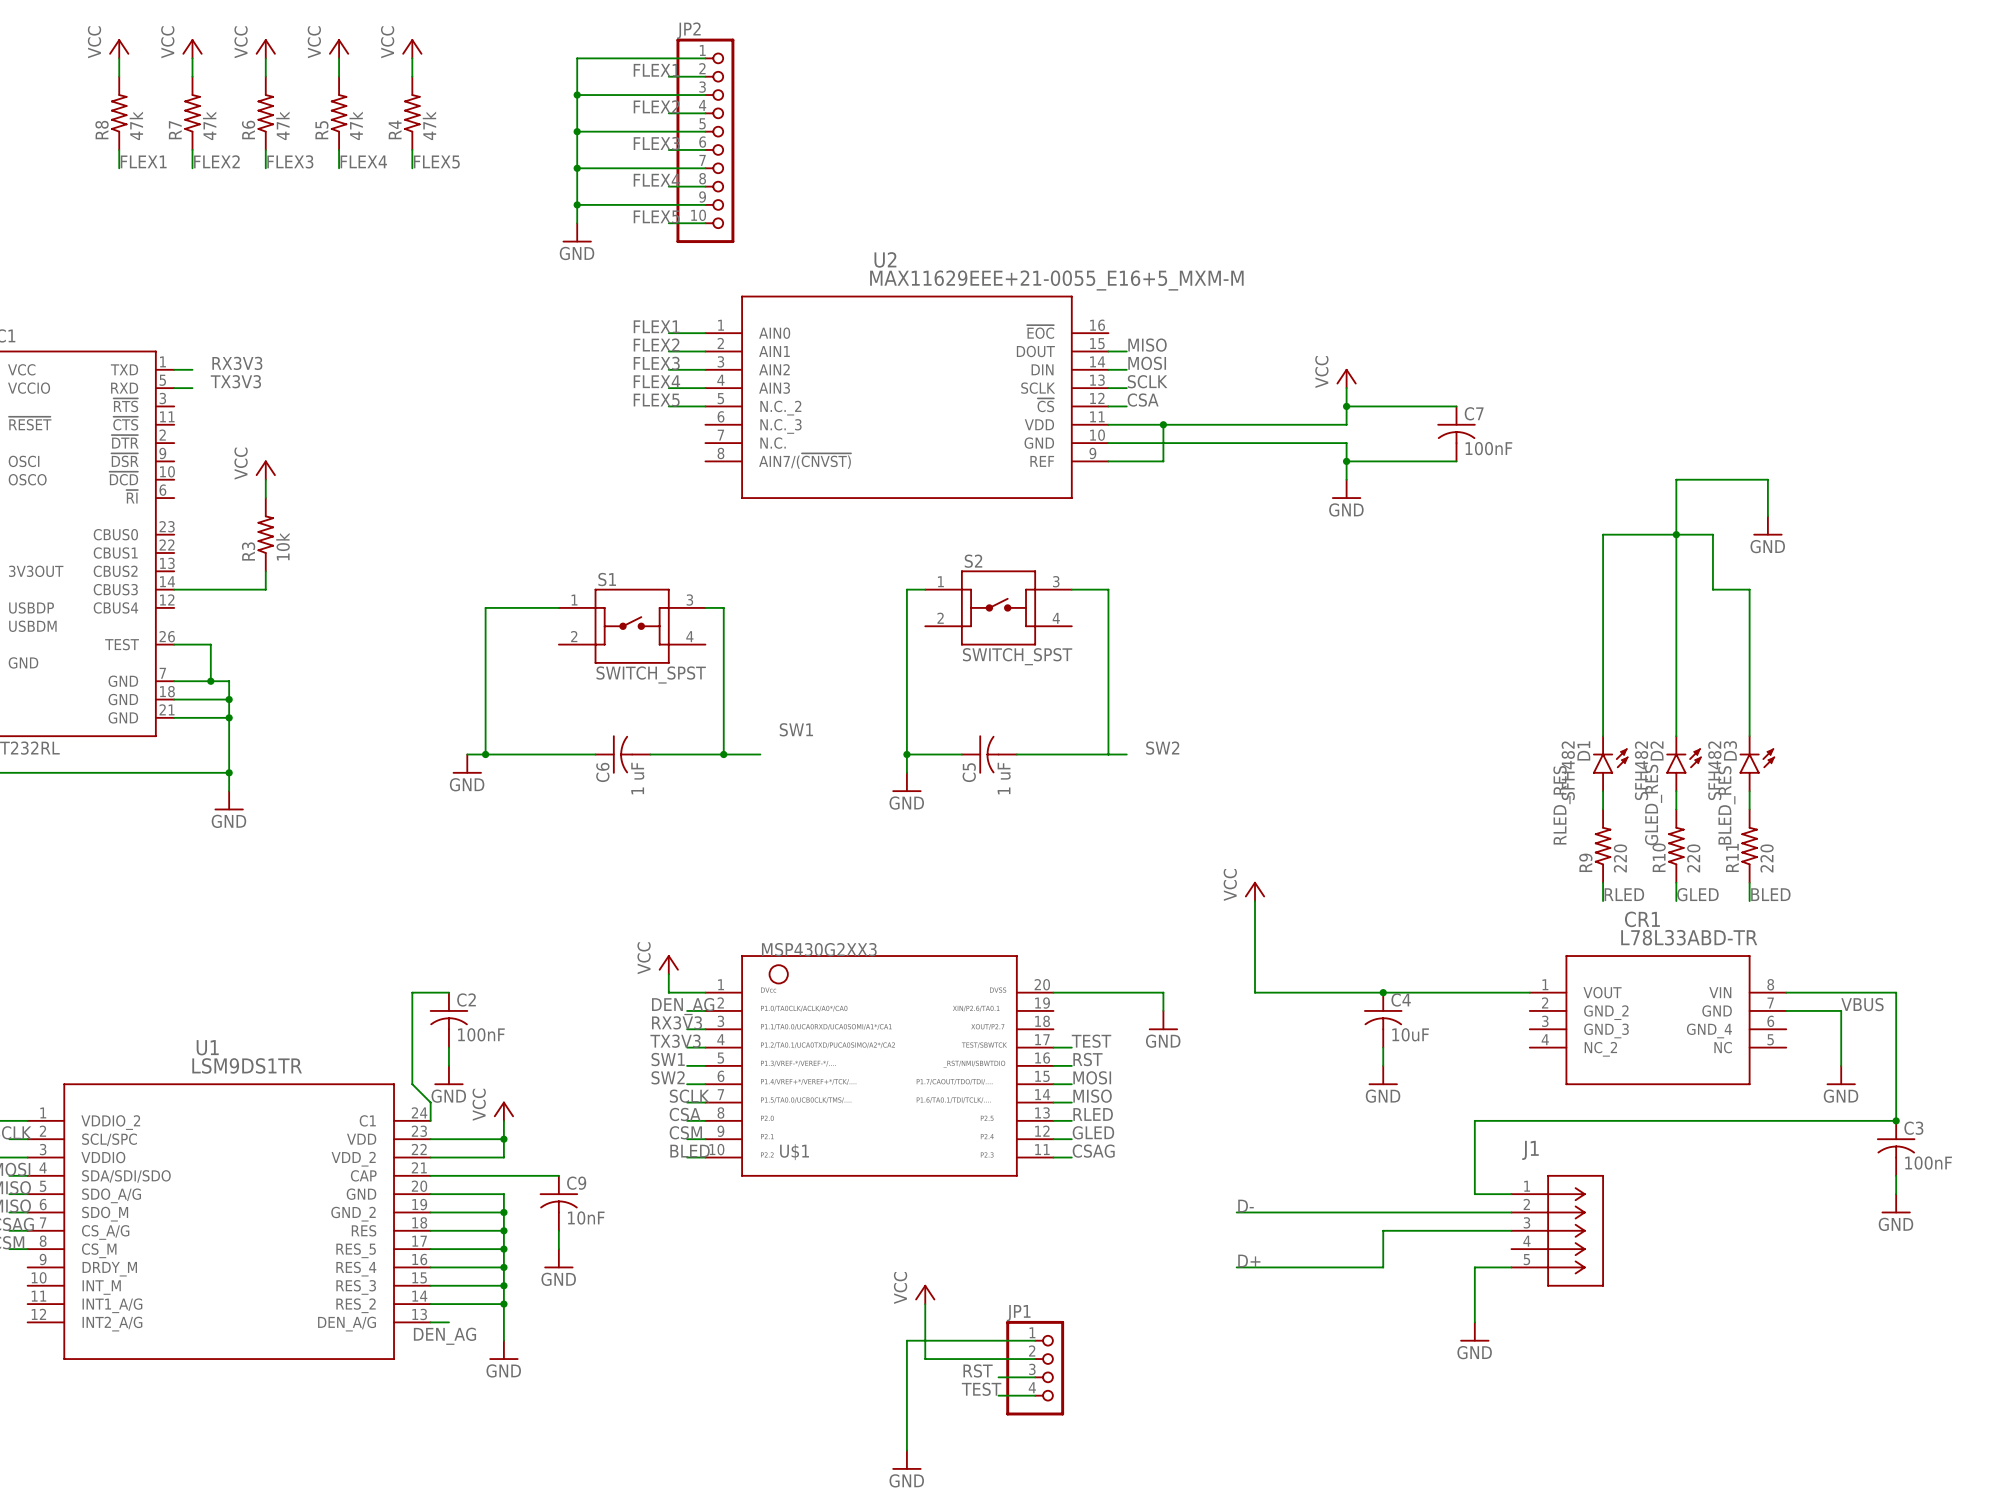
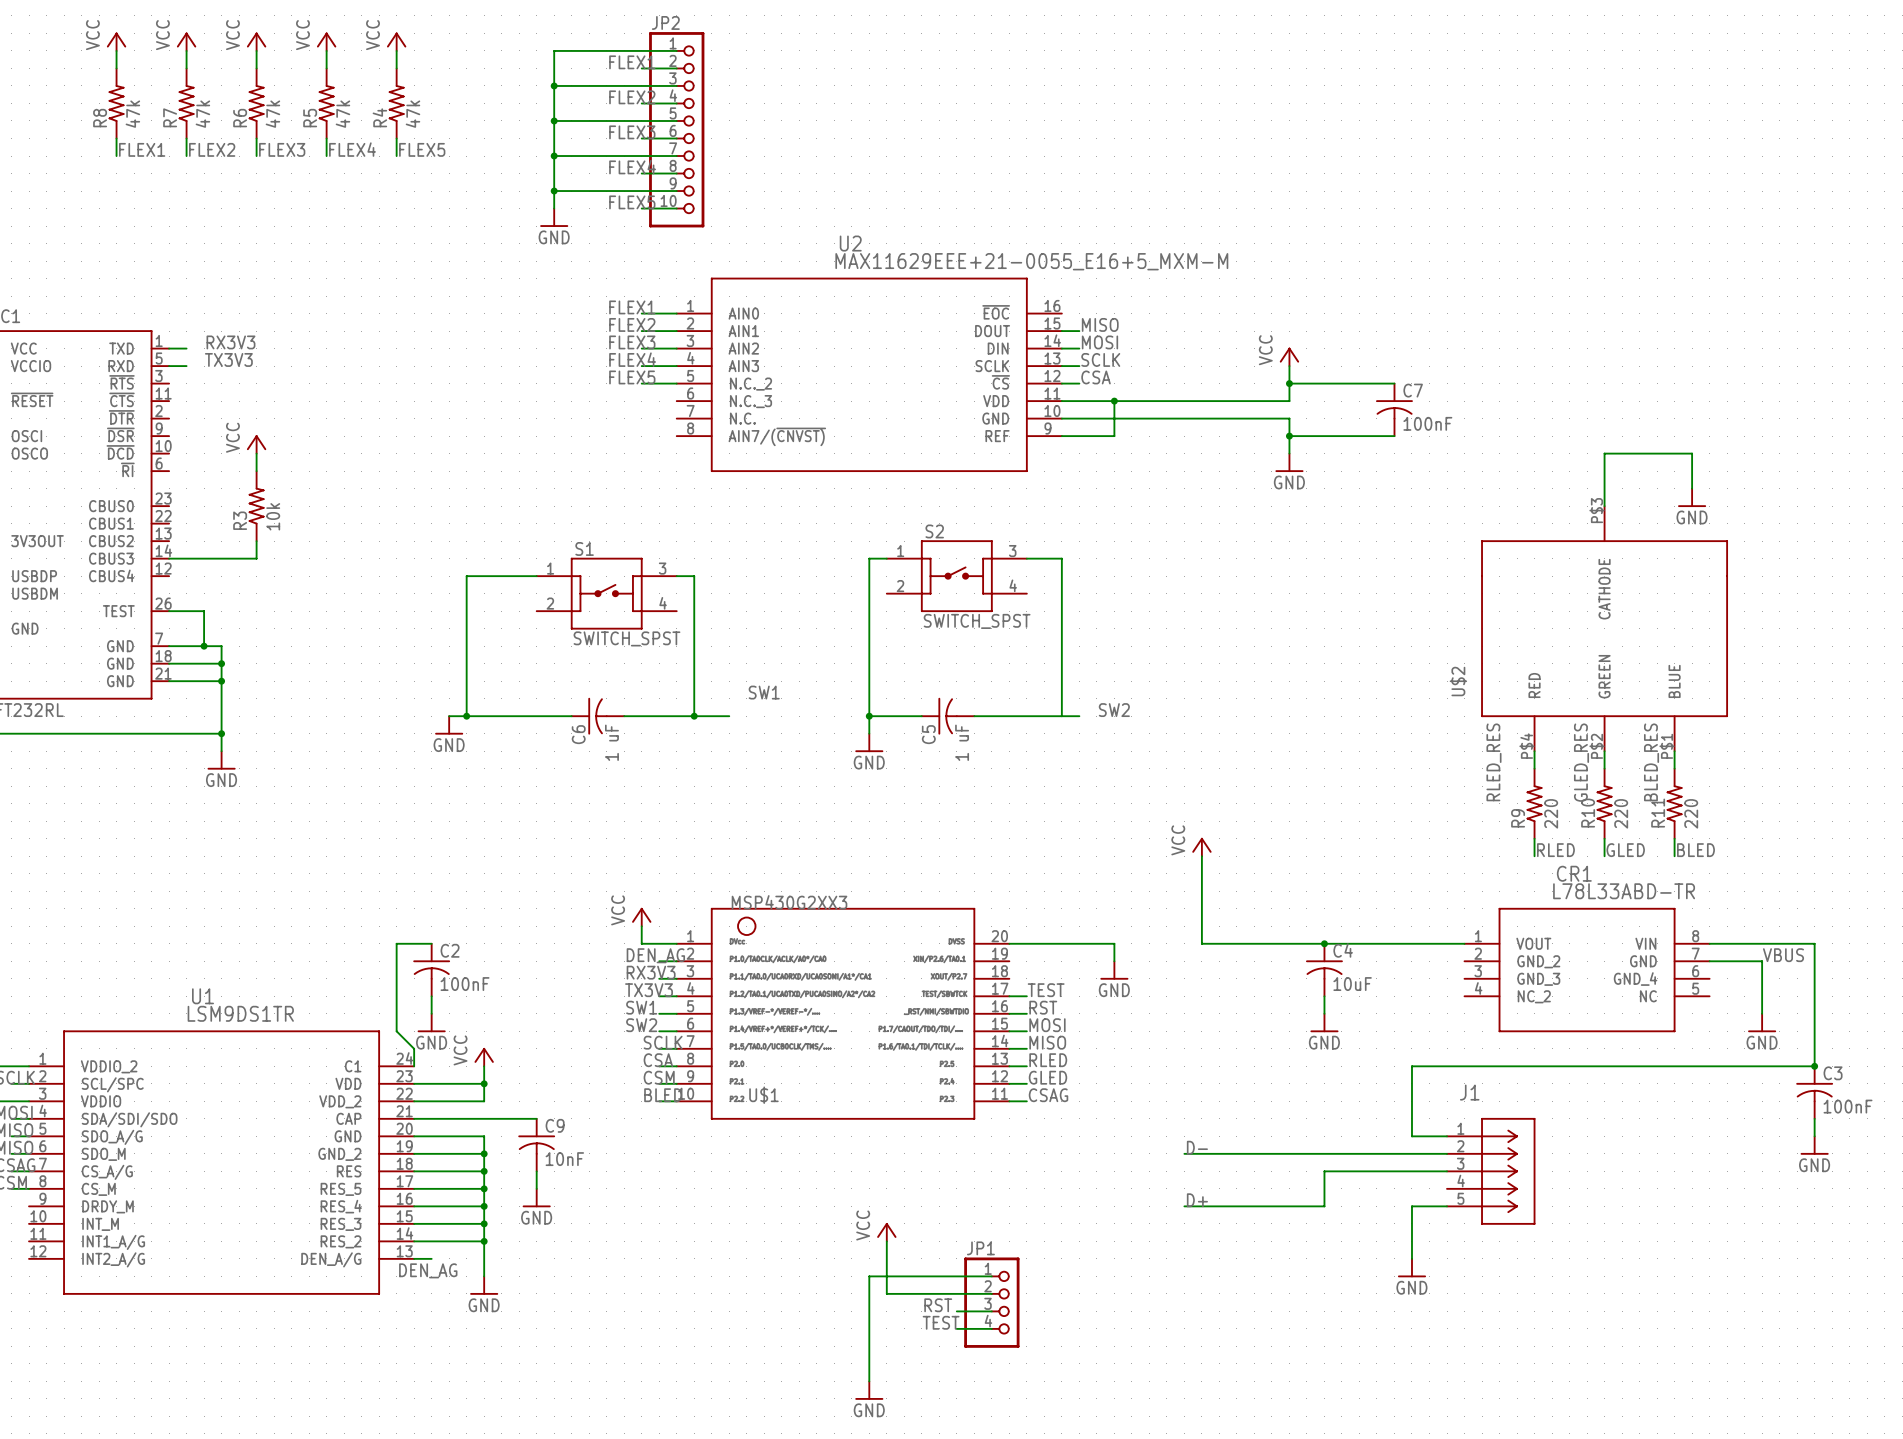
wire: (1676, 534) (1676, 736) -> none
junction: (1676, 534) -> none
U$2: none -> (1604, 628)
wire: (1603, 736) (1603, 534) (1712, 534) (1712, 589) (1749, 589) (1749, 736) -> none
D1: SFH482 (1610, 763) -> none
D2: SFH482 (1683, 763) -> none
D3: SFH482 (1757, 763) -> none

